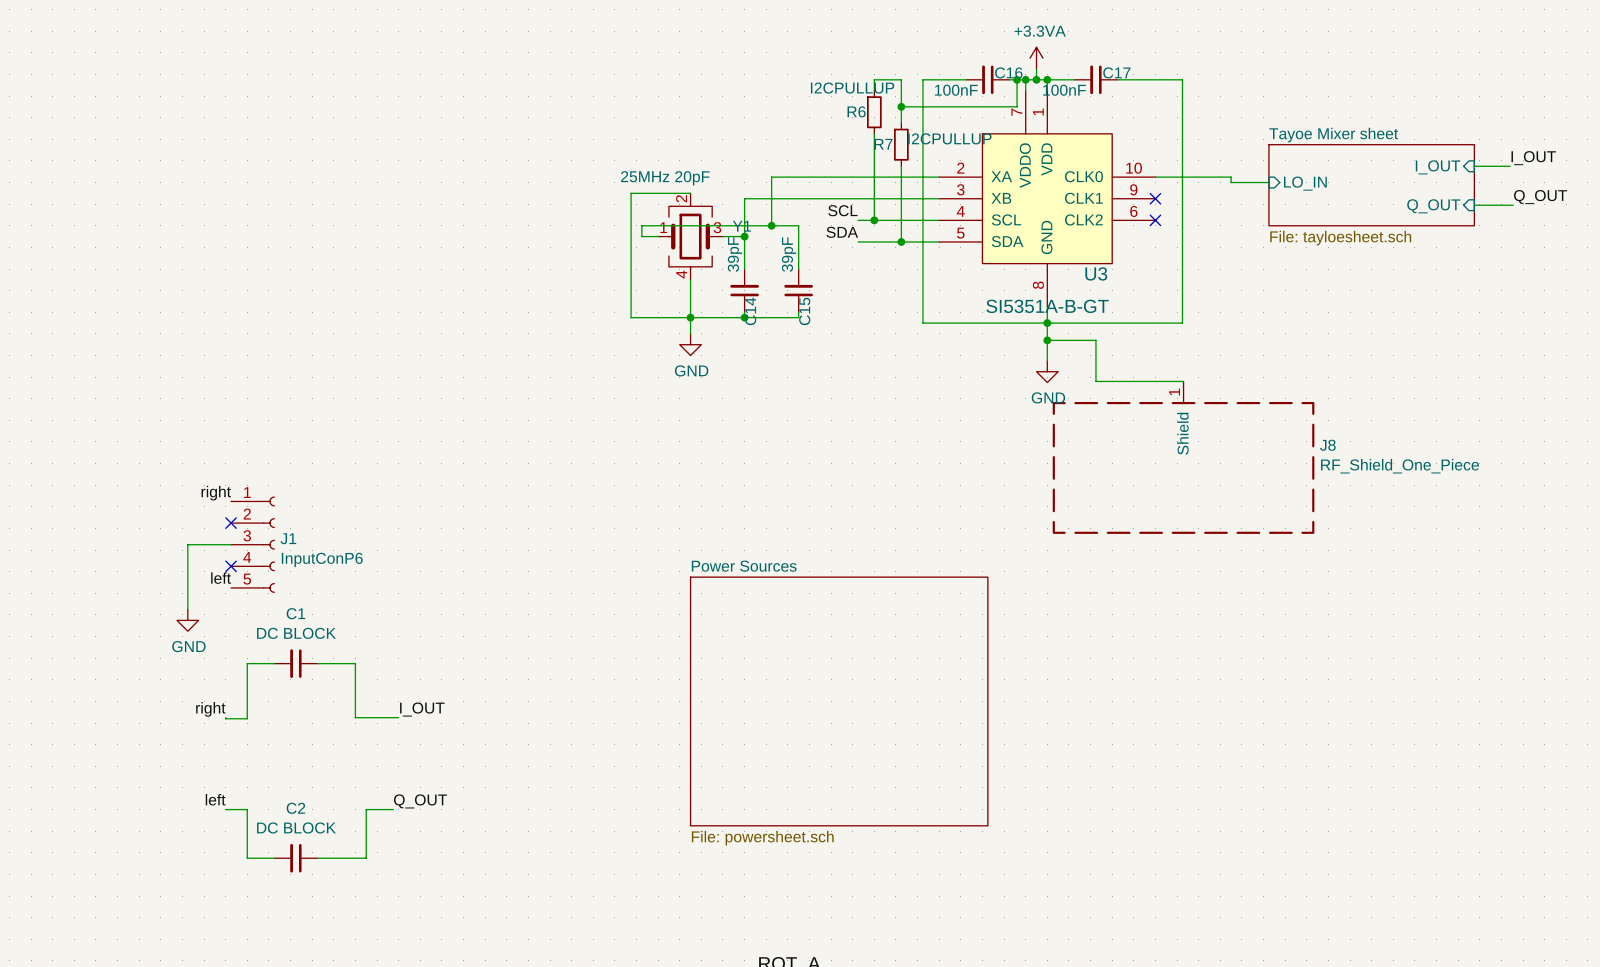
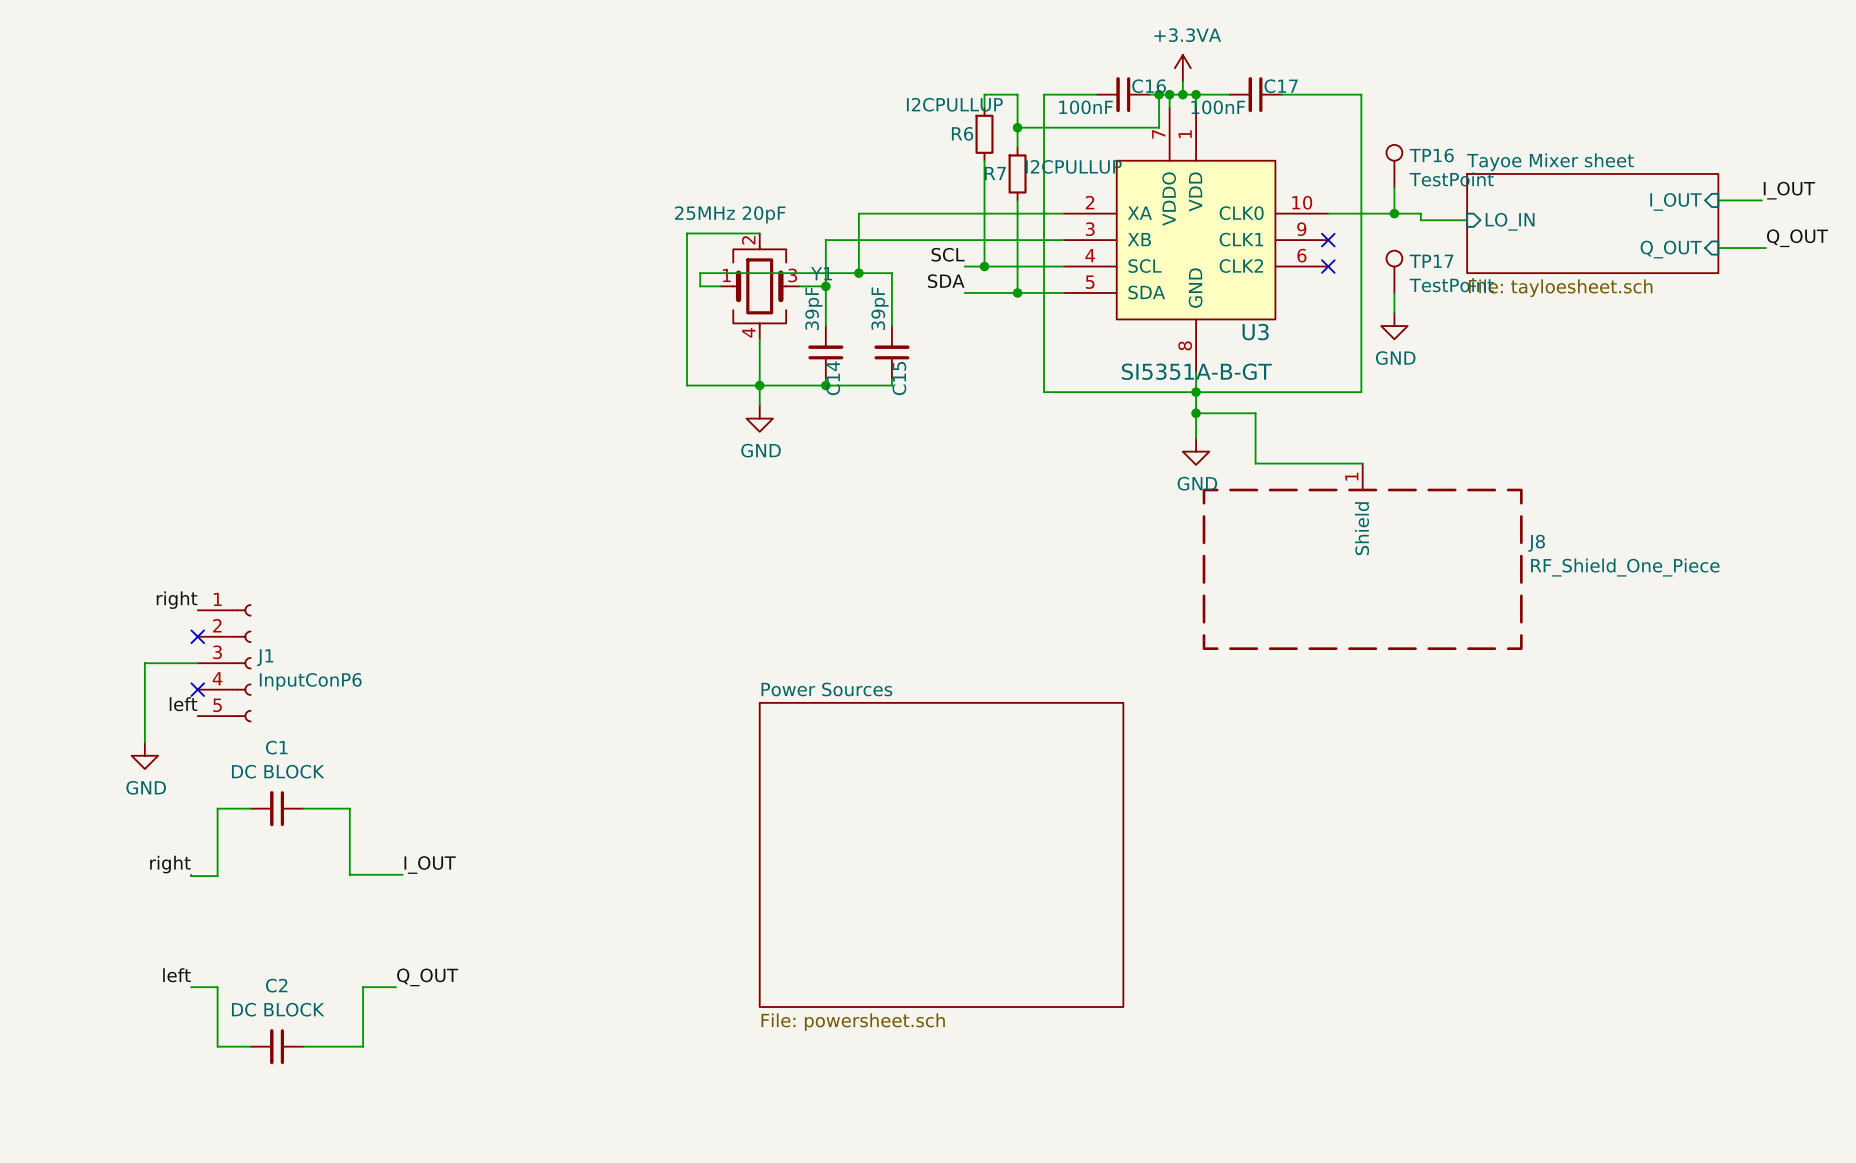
TP16: none -> TestPoint (1394, 166)
wire: none -> (1394, 187) (1394, 213)
junction: none -> (1394, 213)
TP17: none -> TestPoint (1394, 271)
wire: none -> (1394, 292) (1394, 312)
power symbol: none -> GND (1394, 326)

